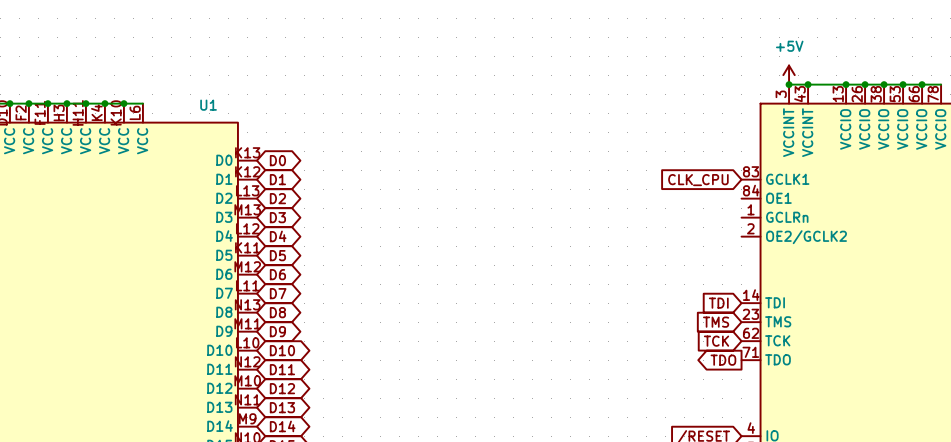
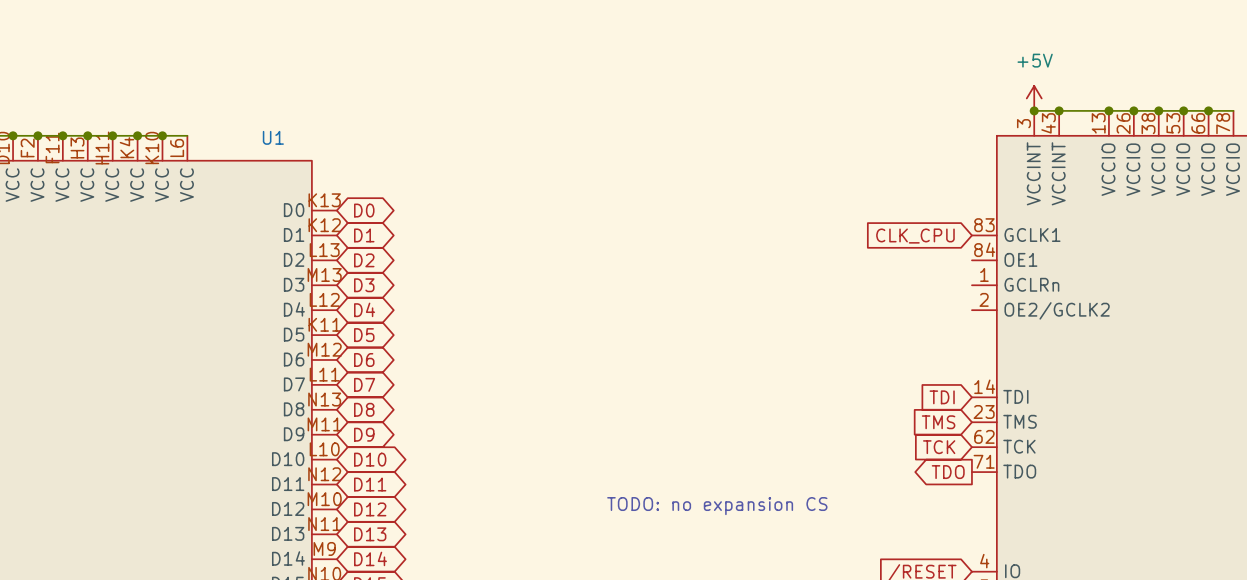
text: none -> TODO: no expansion CS (717, 506)

